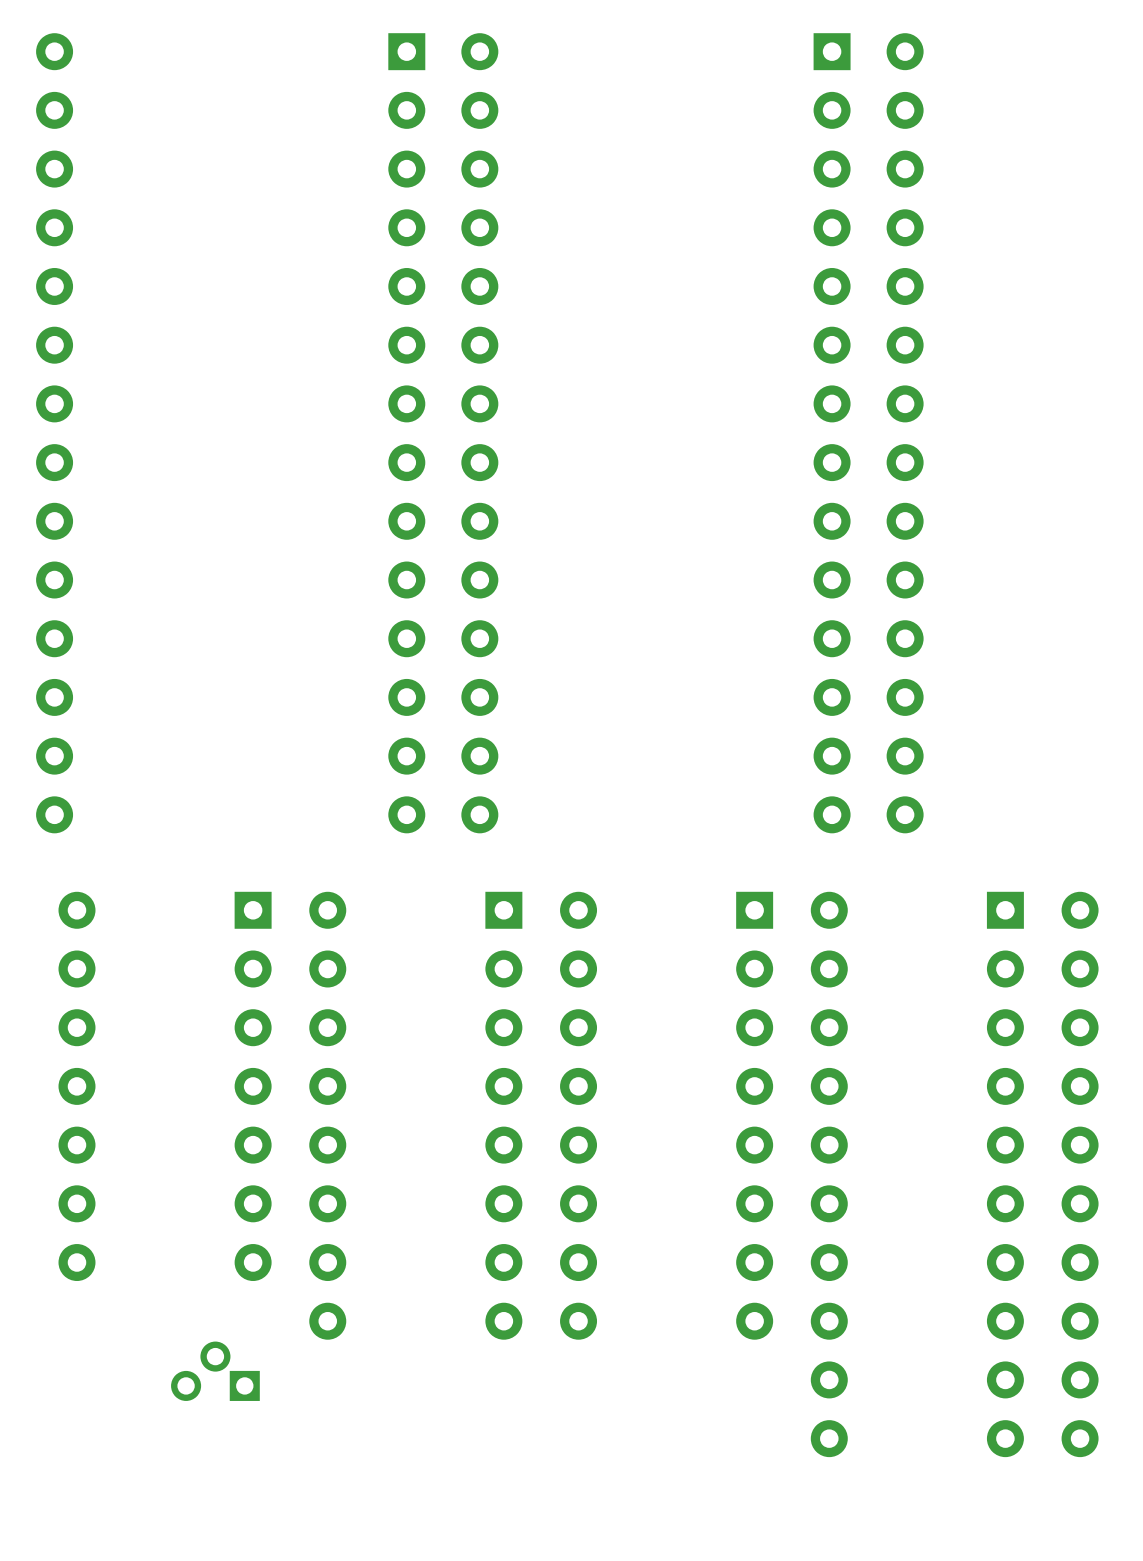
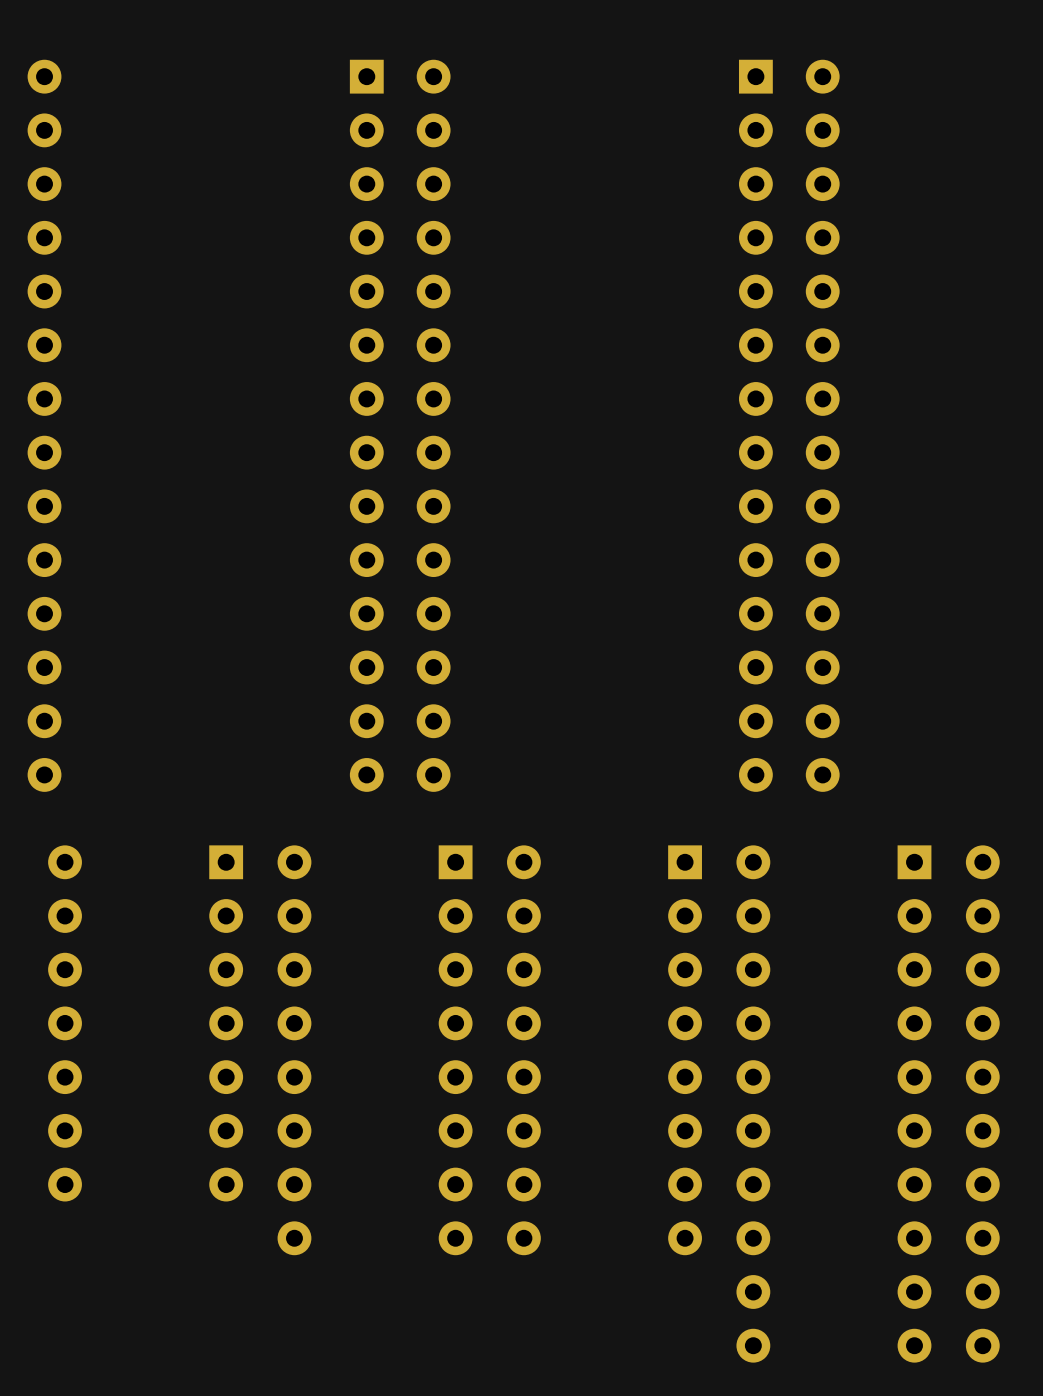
part: (215, 1371) -> none

